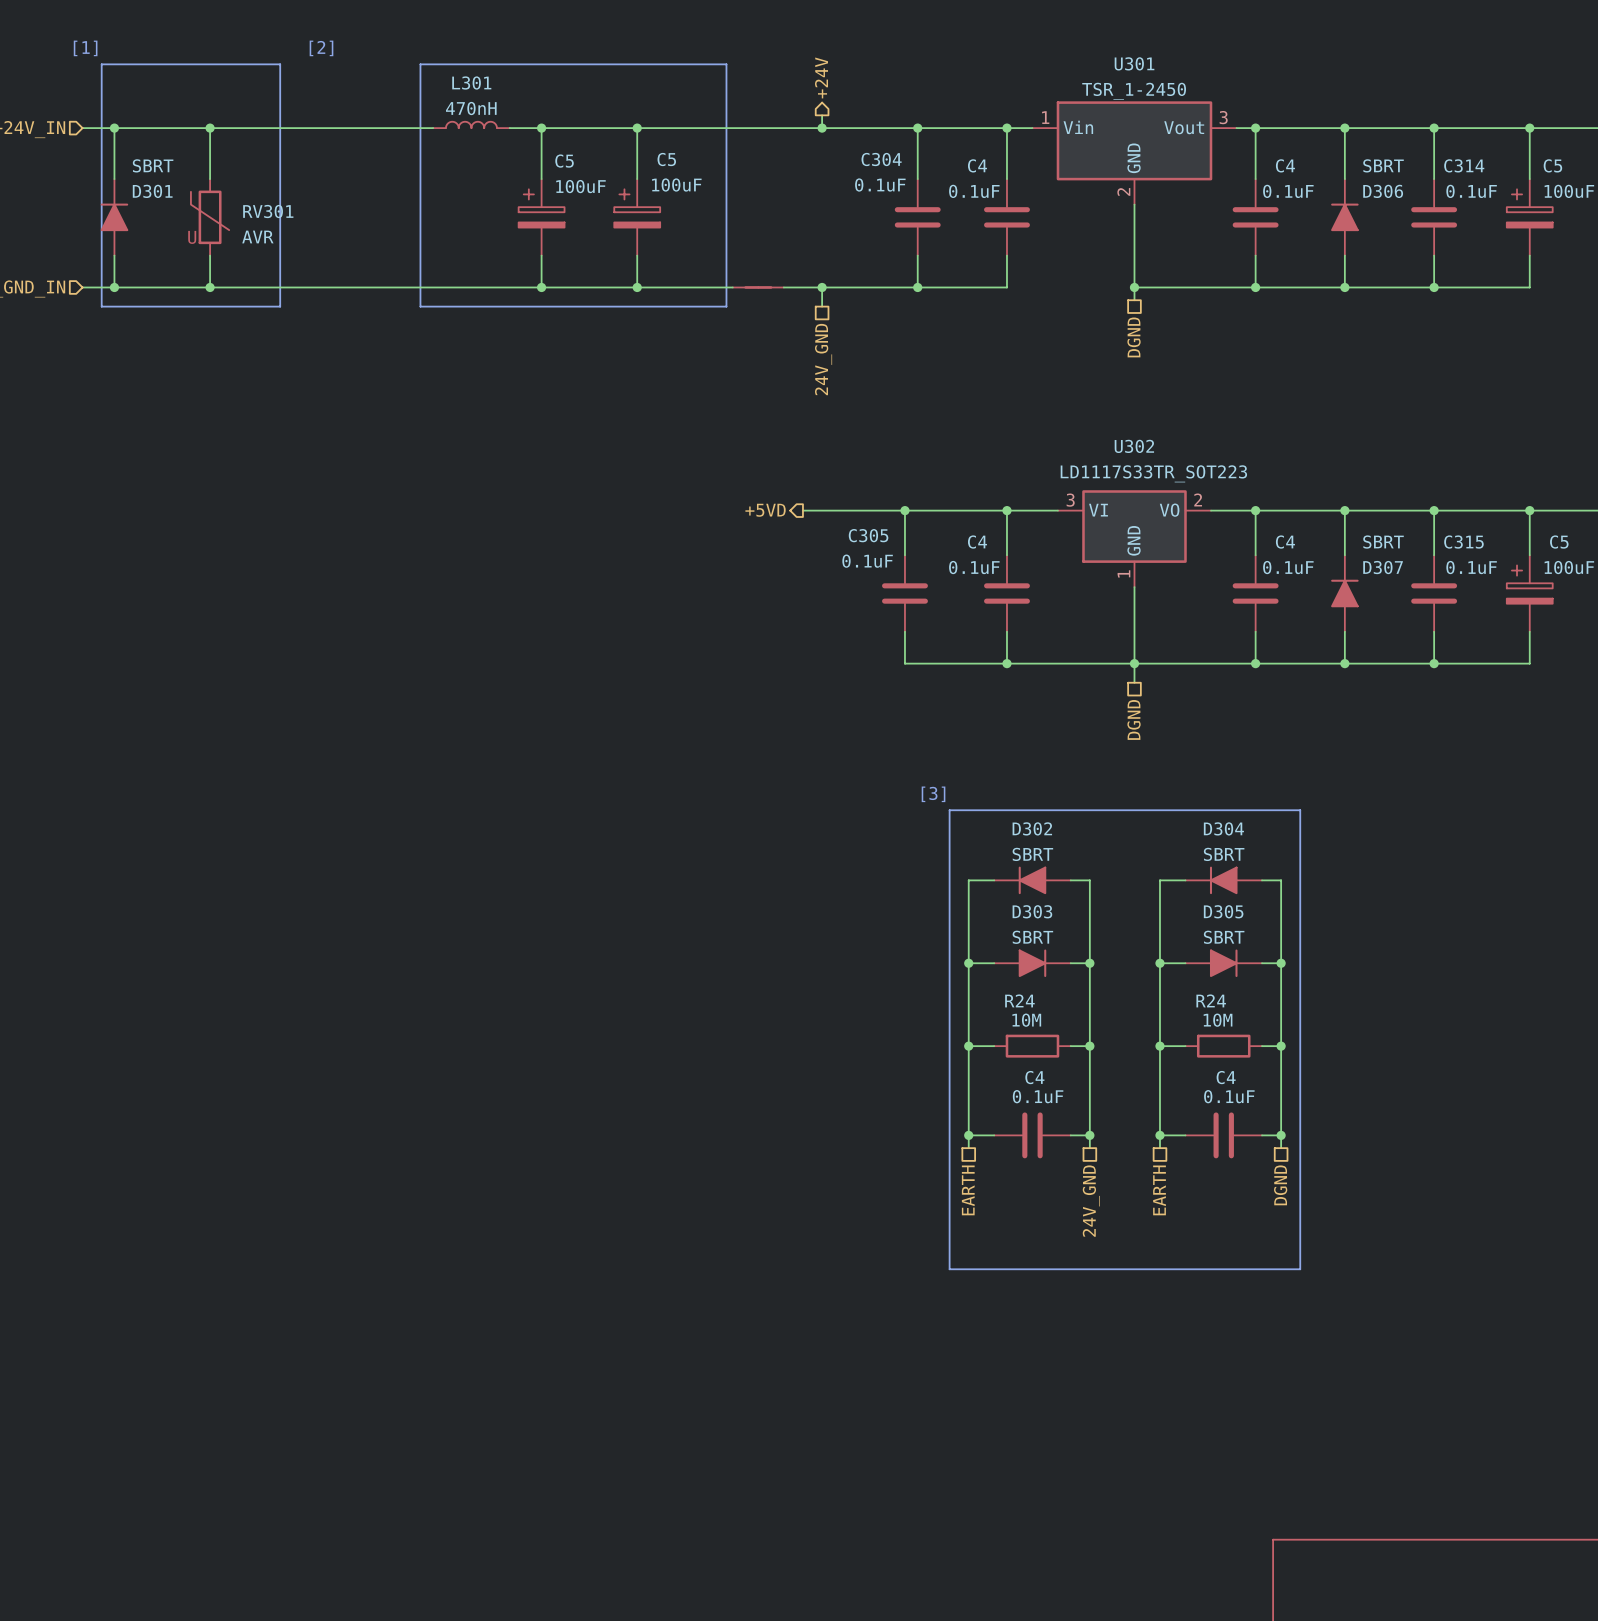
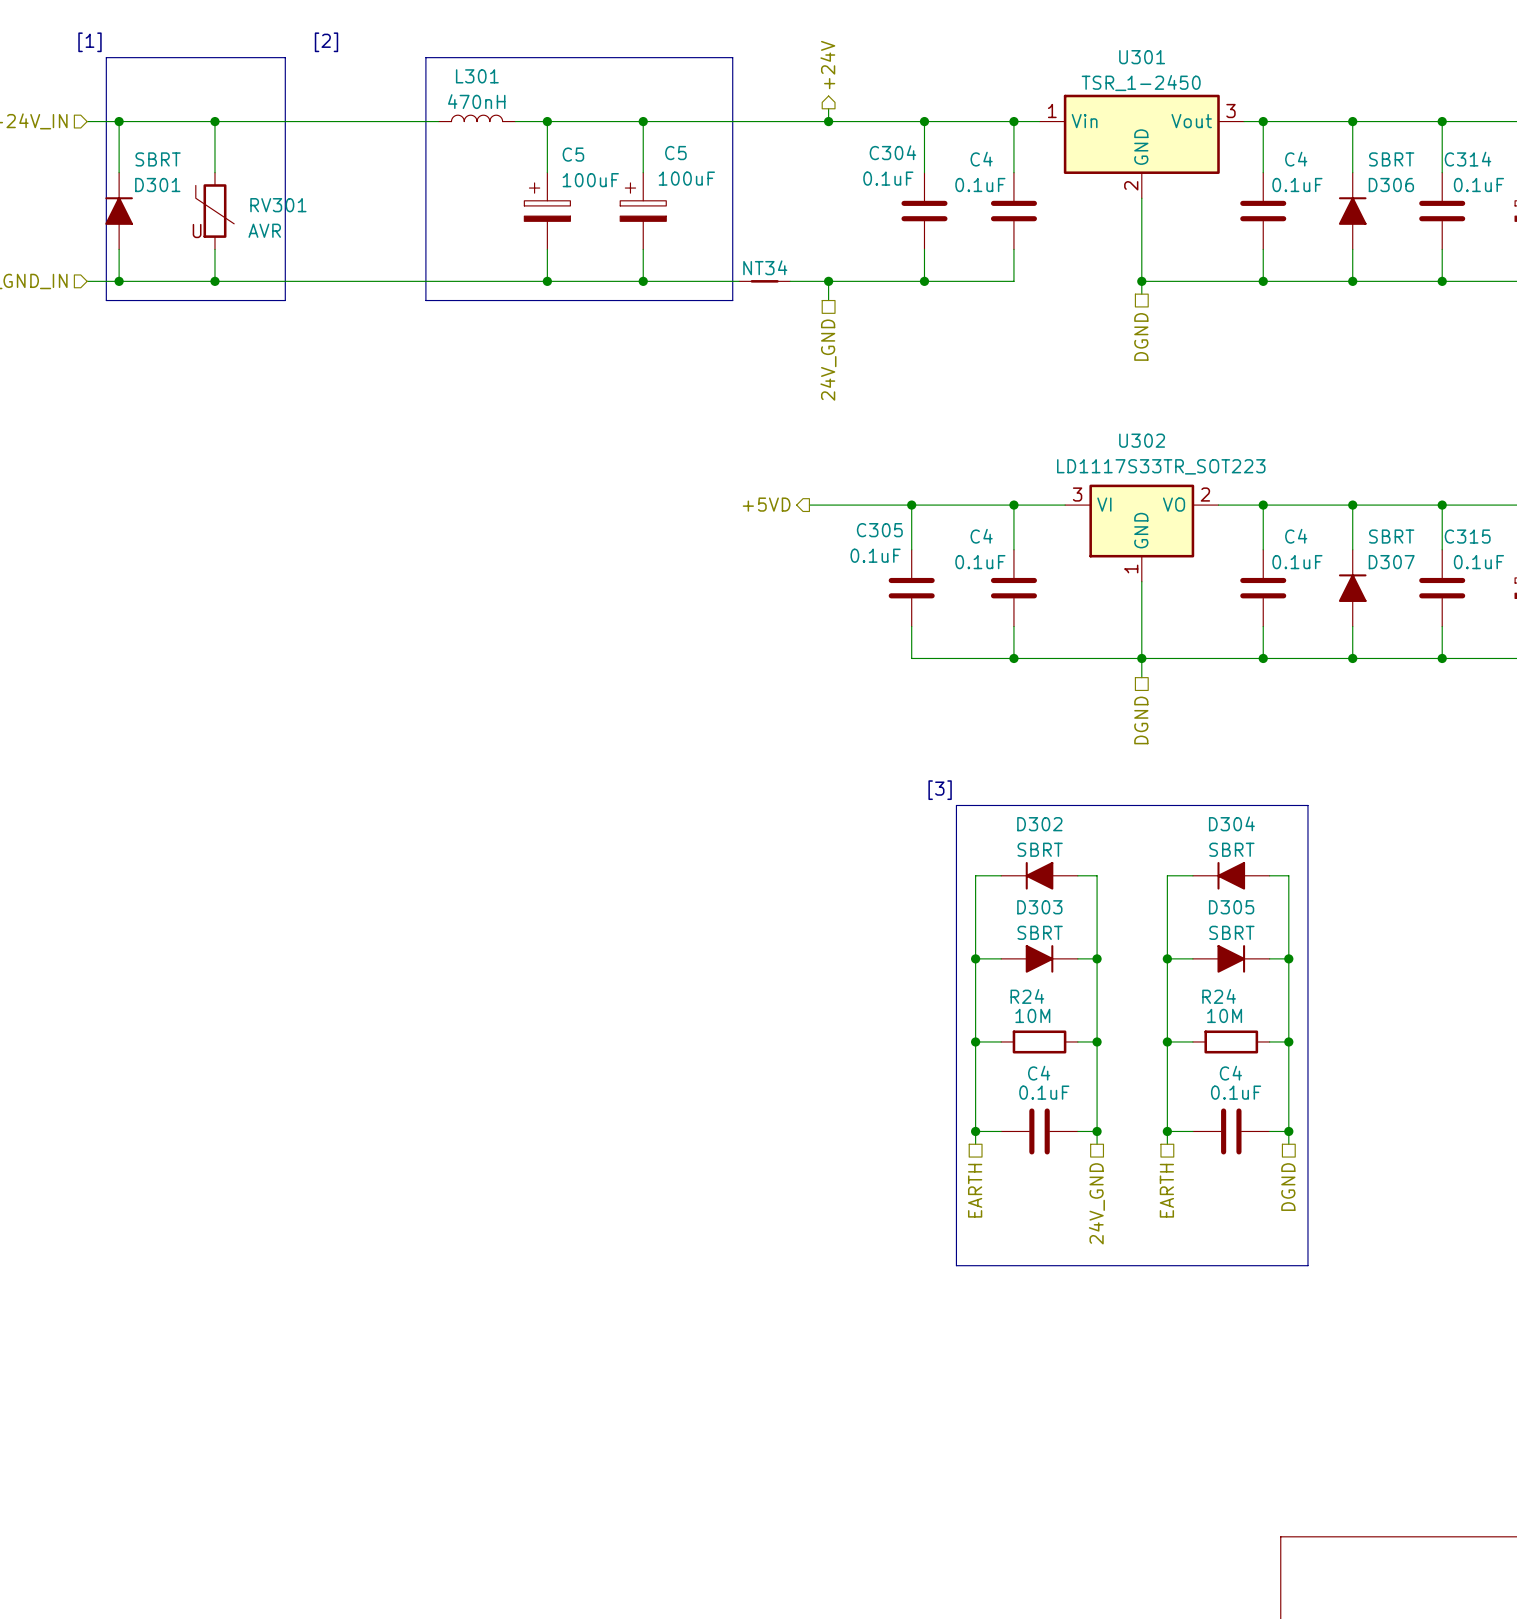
NT34 name: none -> NT34 (765, 267)

